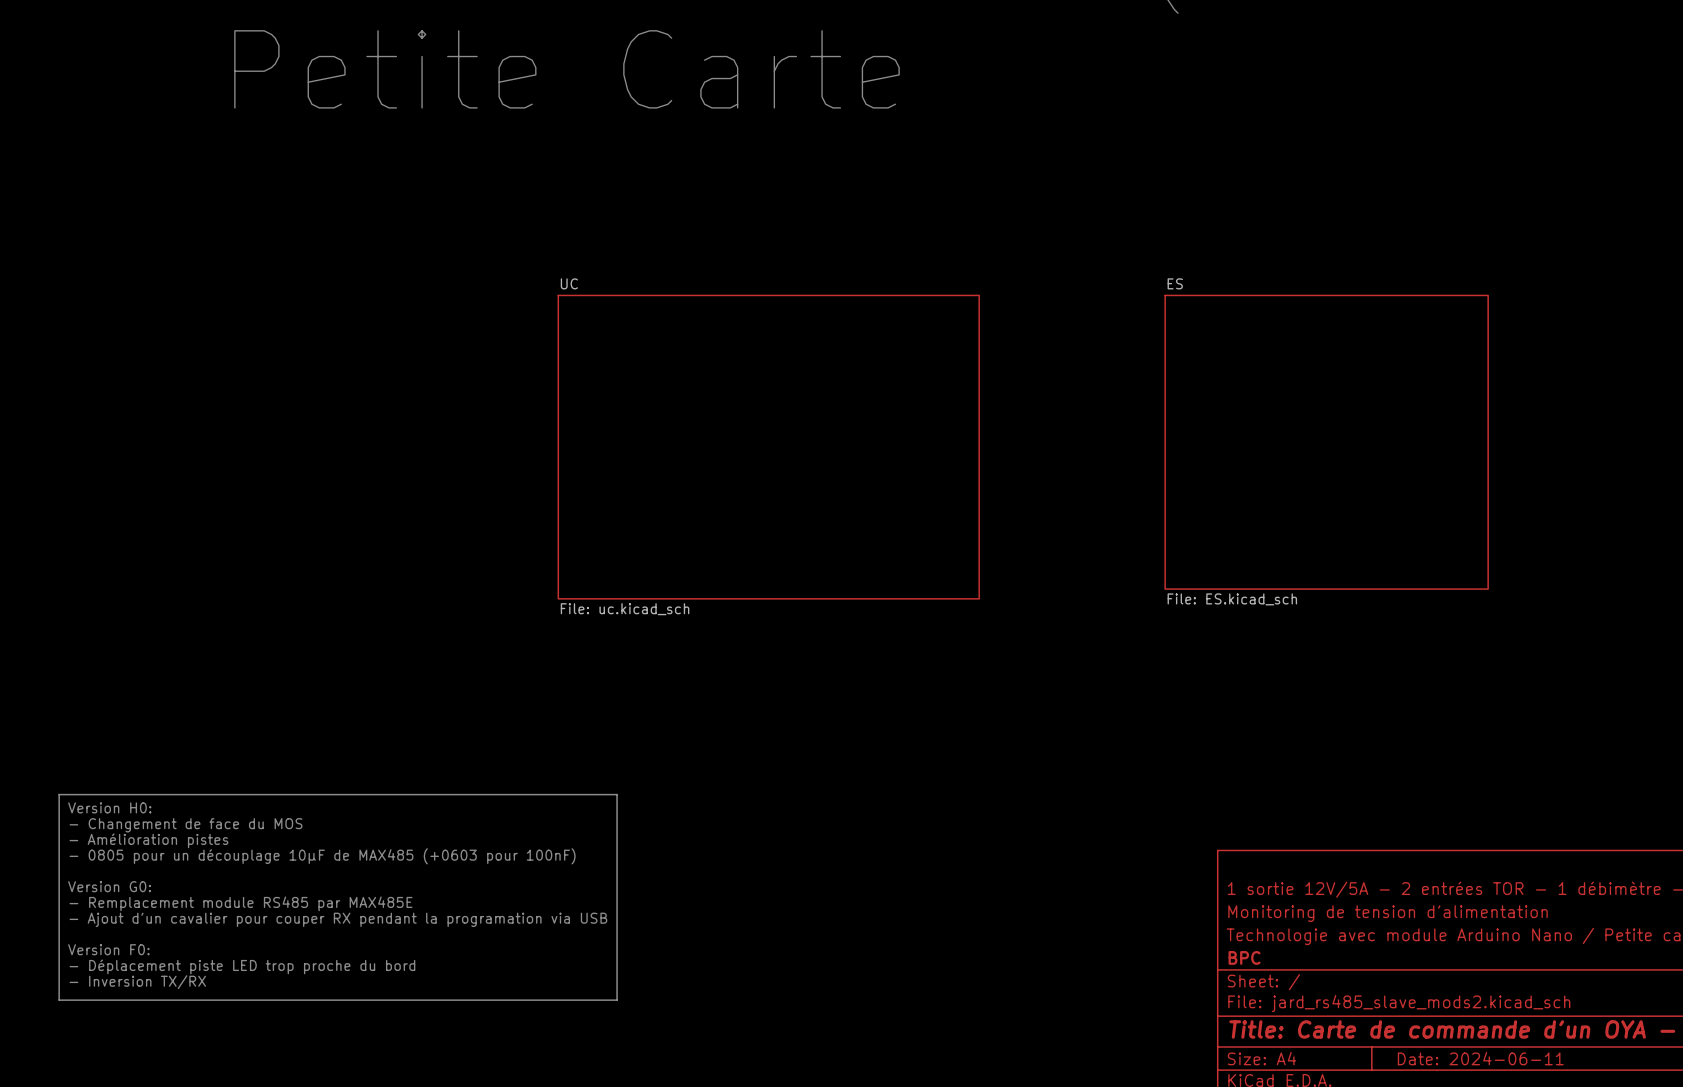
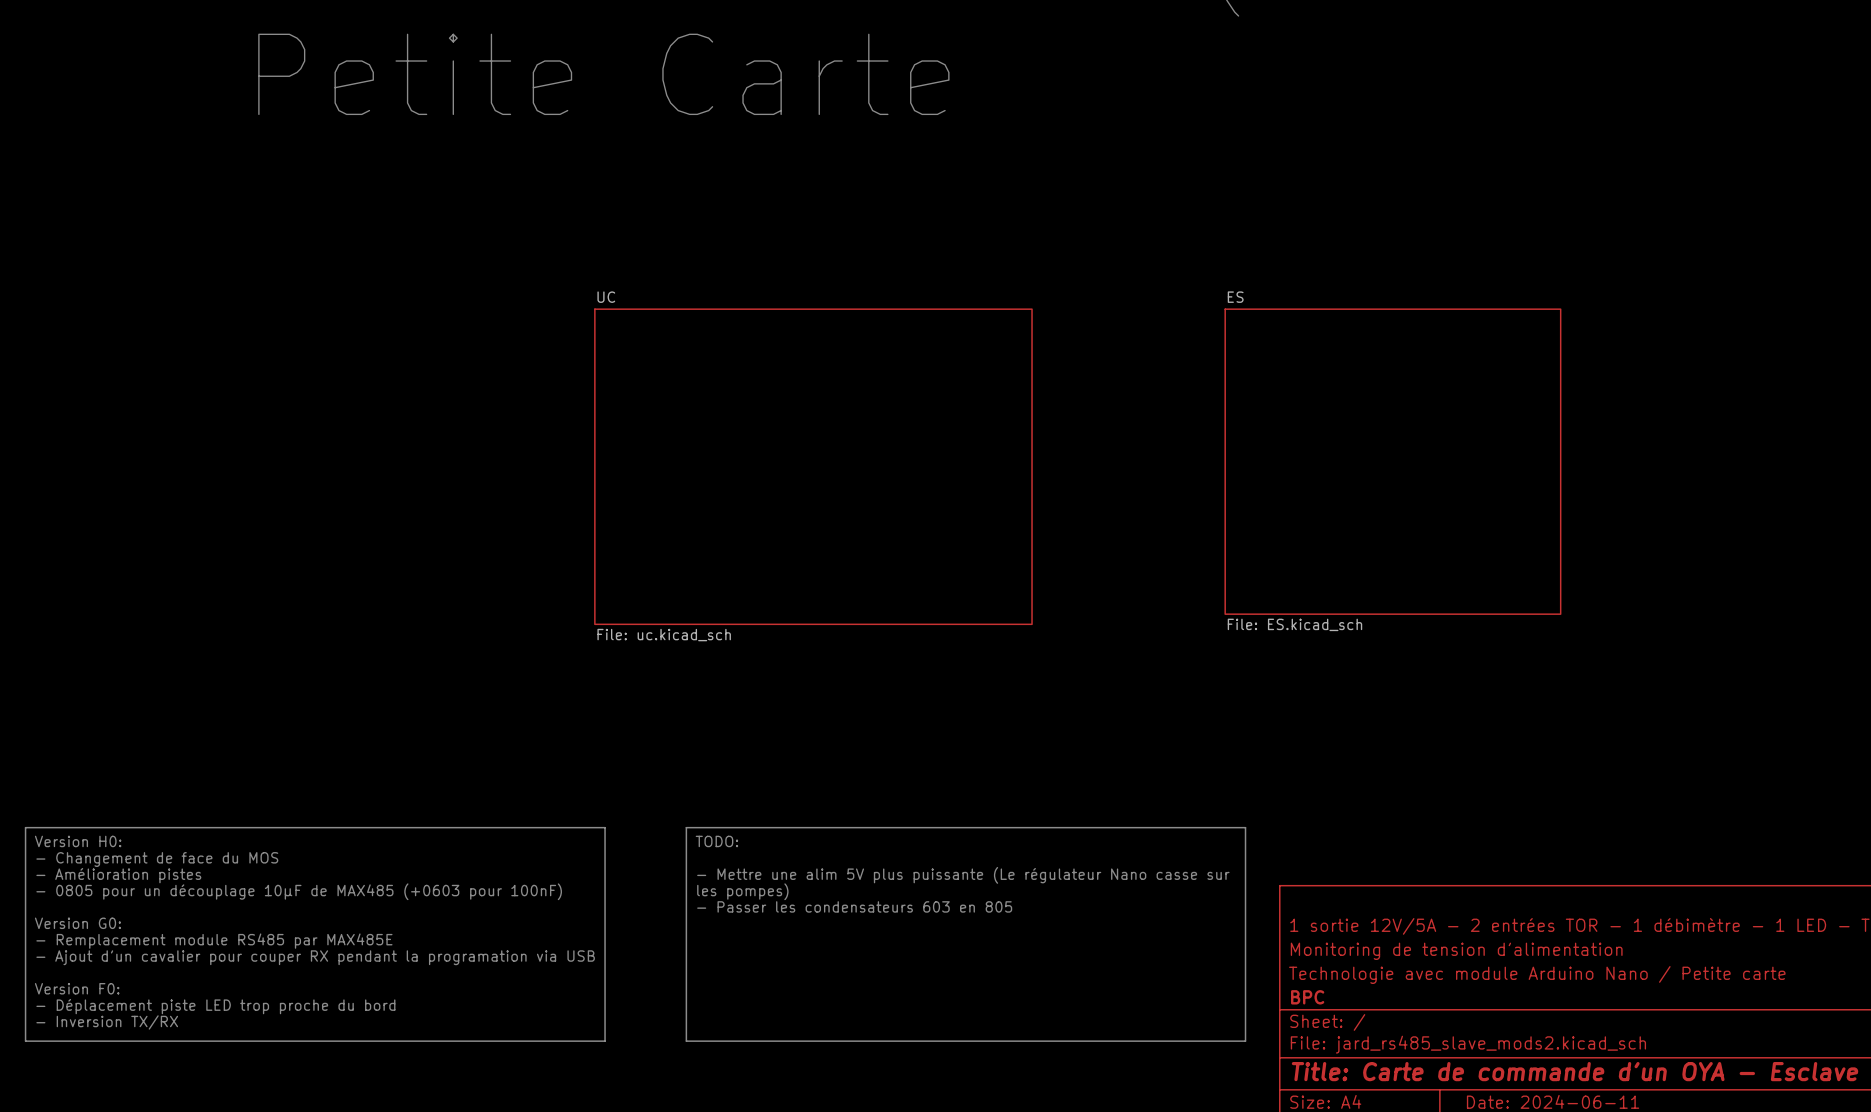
line: (59, 794) (59, 1000) -> (76, 827) (25, 827) (25, 1041) (76, 1041)
line: (568, 794) (617, 794) (617, 1000) (568, 1000) -> (605, 827) (605, 1041)
line: none -> (686, 827) (1245, 827) (1245, 1041) (686, 1041) (686, 827)
text position: Version H0: (109, 807) -> Version H0: (78, 841)
text: none -> TODO: (716, 841)
text position: - Changement de face du MOS (186, 825) -> - Changement de face du MOS (157, 859)
text position: - Amélioration pistes (148, 840) -> - Amélioration pistes (118, 875)
text: none -> - Mettre une alim 5V plus puissante (Le régulateur Nano casse sur (963, 875)
text position: - 0805 pour un découplage 10µF de MAX485 (+0603 pour 100nF) (322, 856) -> - 0805 pour un découplage 10µF de MAX485 (+0603 pour 100nF) (299, 891)
text: none -> les pompes) (742, 891)
text: none -> - Passer les condensateurs 603 en 805 (854, 906)
text position: Version G0: (109, 886) -> Version G0: (77, 923)
text position: - Remplacement module RS485 par MAX485E (241, 903) -> - Remplacement module RS485 par MAX485E (214, 941)
text position: - Ajout d'un cavalier pour couper RX pendant la programation via USB (338, 919) -> - Ajout d'un cavalier pour couper RX pendant la programation via USB (315, 957)
text position: Version F0: (108, 949) -> Version F0: (77, 988)
text position: - Déplacement piste LED trop proche du bord (242, 966) -> - Déplacement piste LED trop proche du bord (215, 1006)
text position: - Inversion TX/RX (137, 982) -> - Inversion TX/RX (107, 1022)

